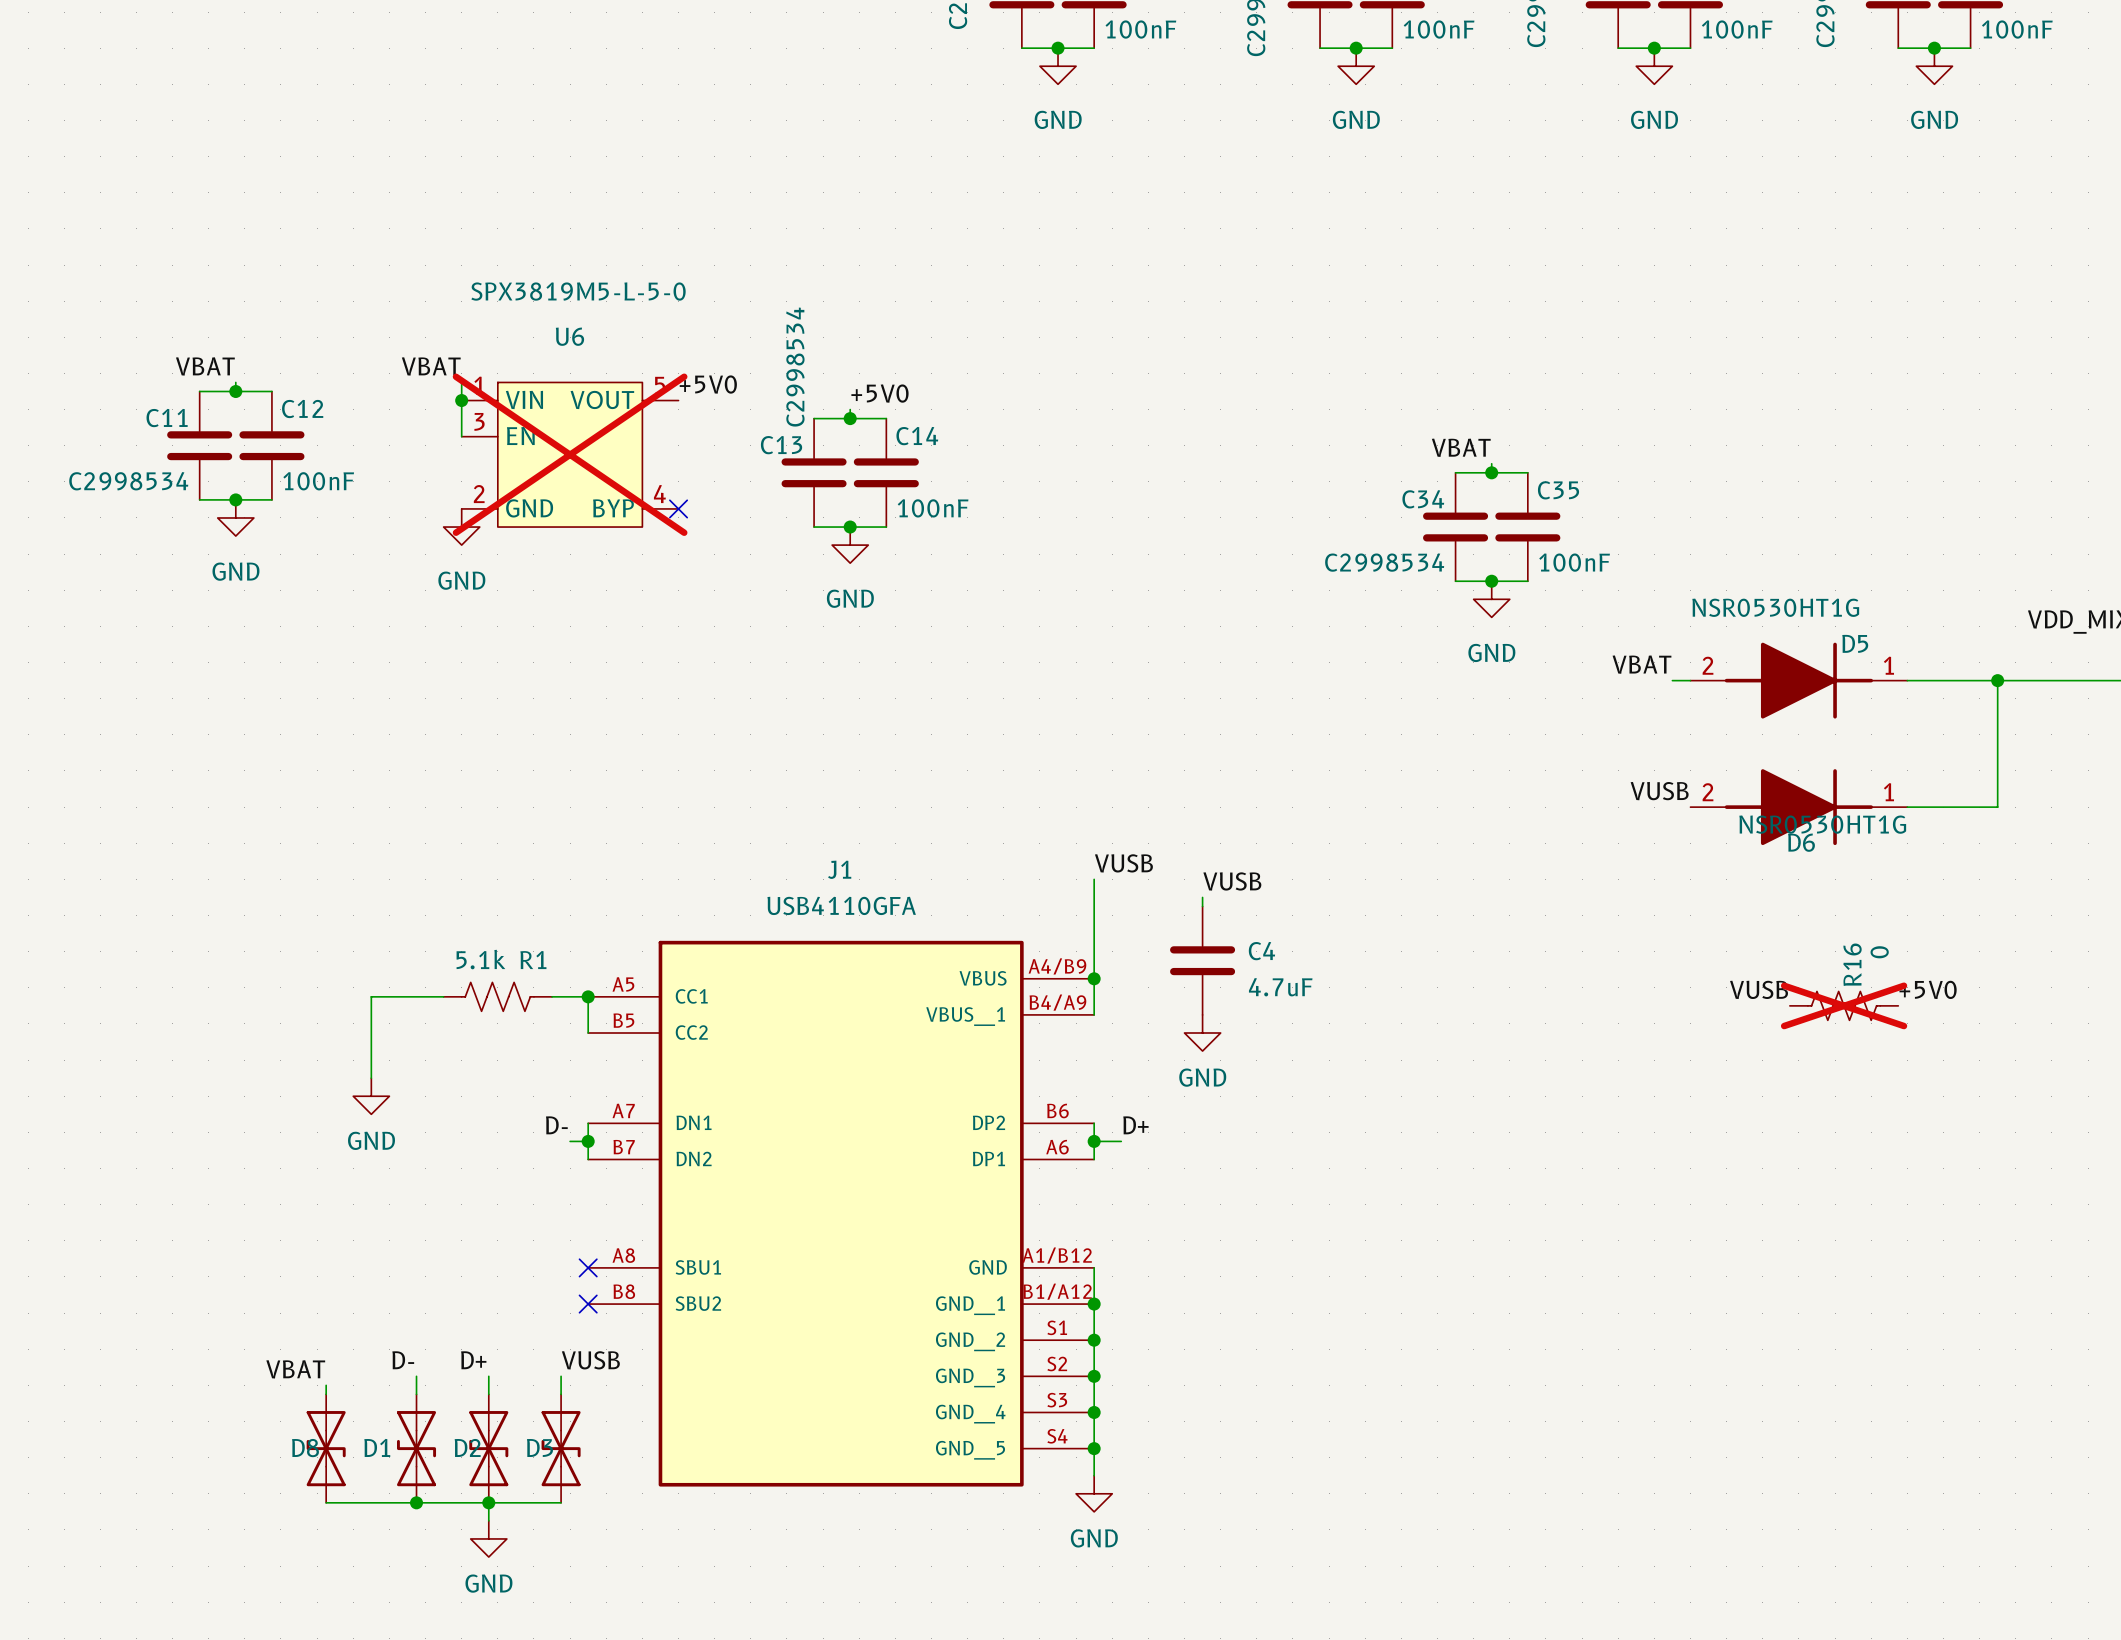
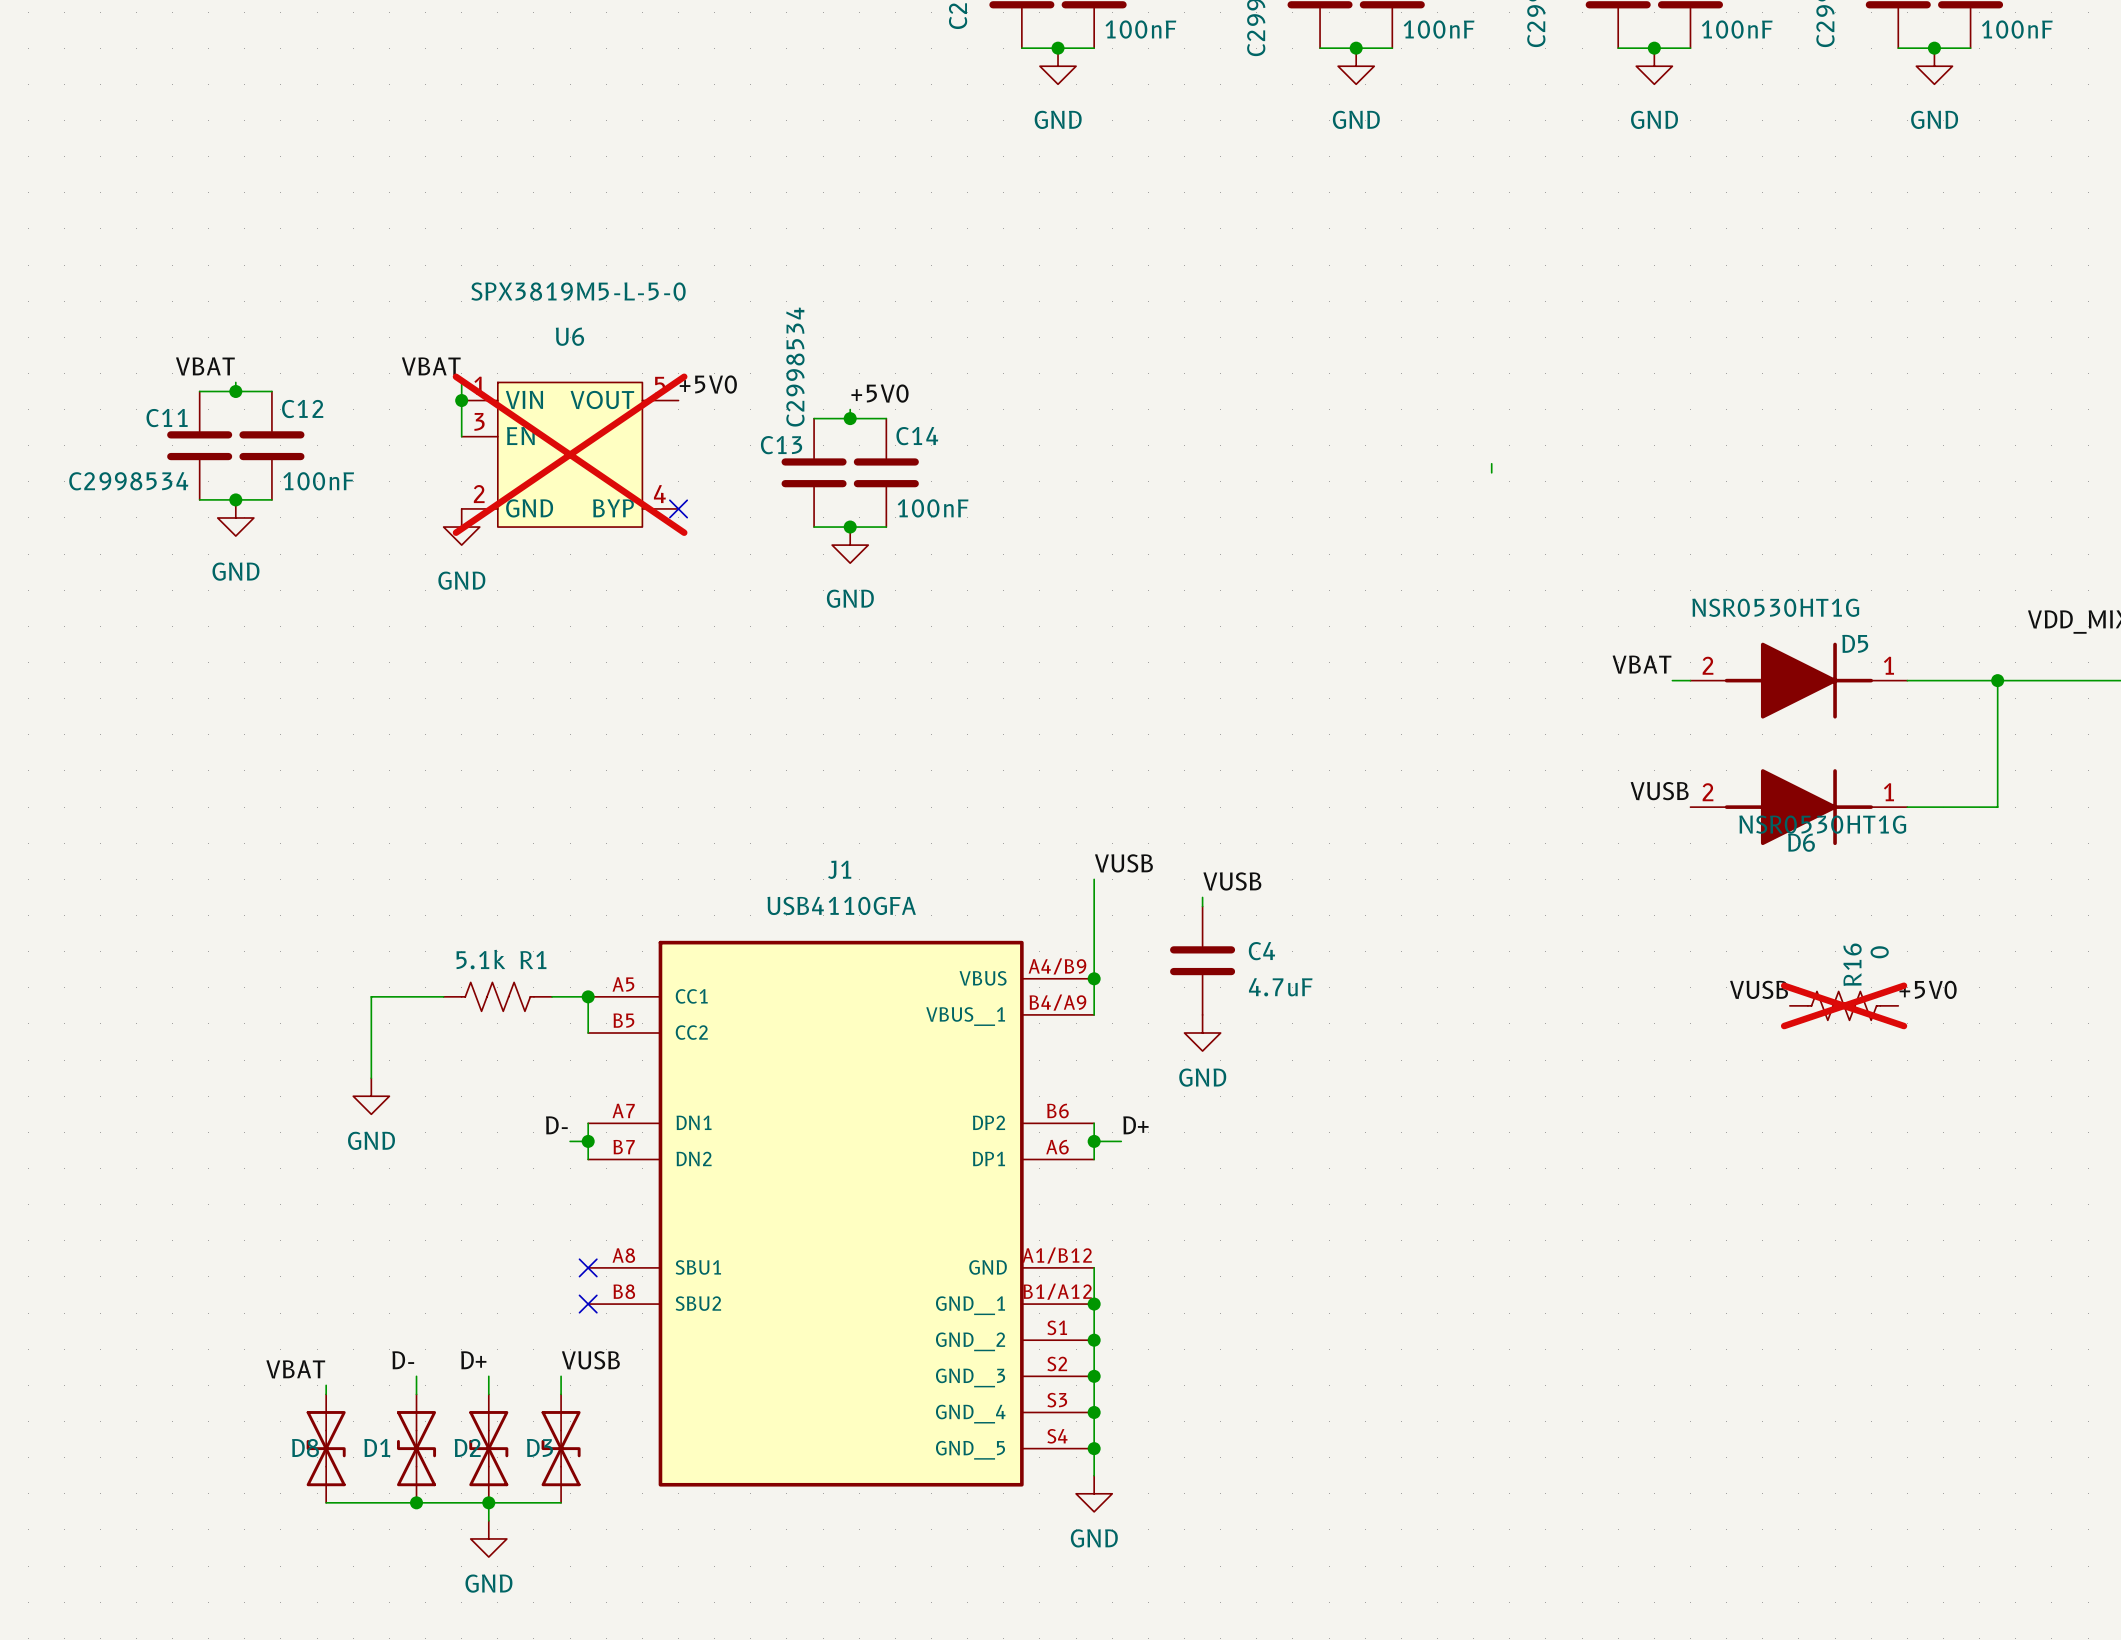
label: VBAT (1461, 447) -> none
wire: (1455, 472) (1527, 472) -> none
junction: (1491, 472) -> none
C34: C2998534 (1455, 527) -> none
C35: 100nF (1527, 527) -> none
wire: (1455, 581) (1527, 581) -> none
junction: (1491, 581) -> none
power symbol: GND (1491, 599) -> none

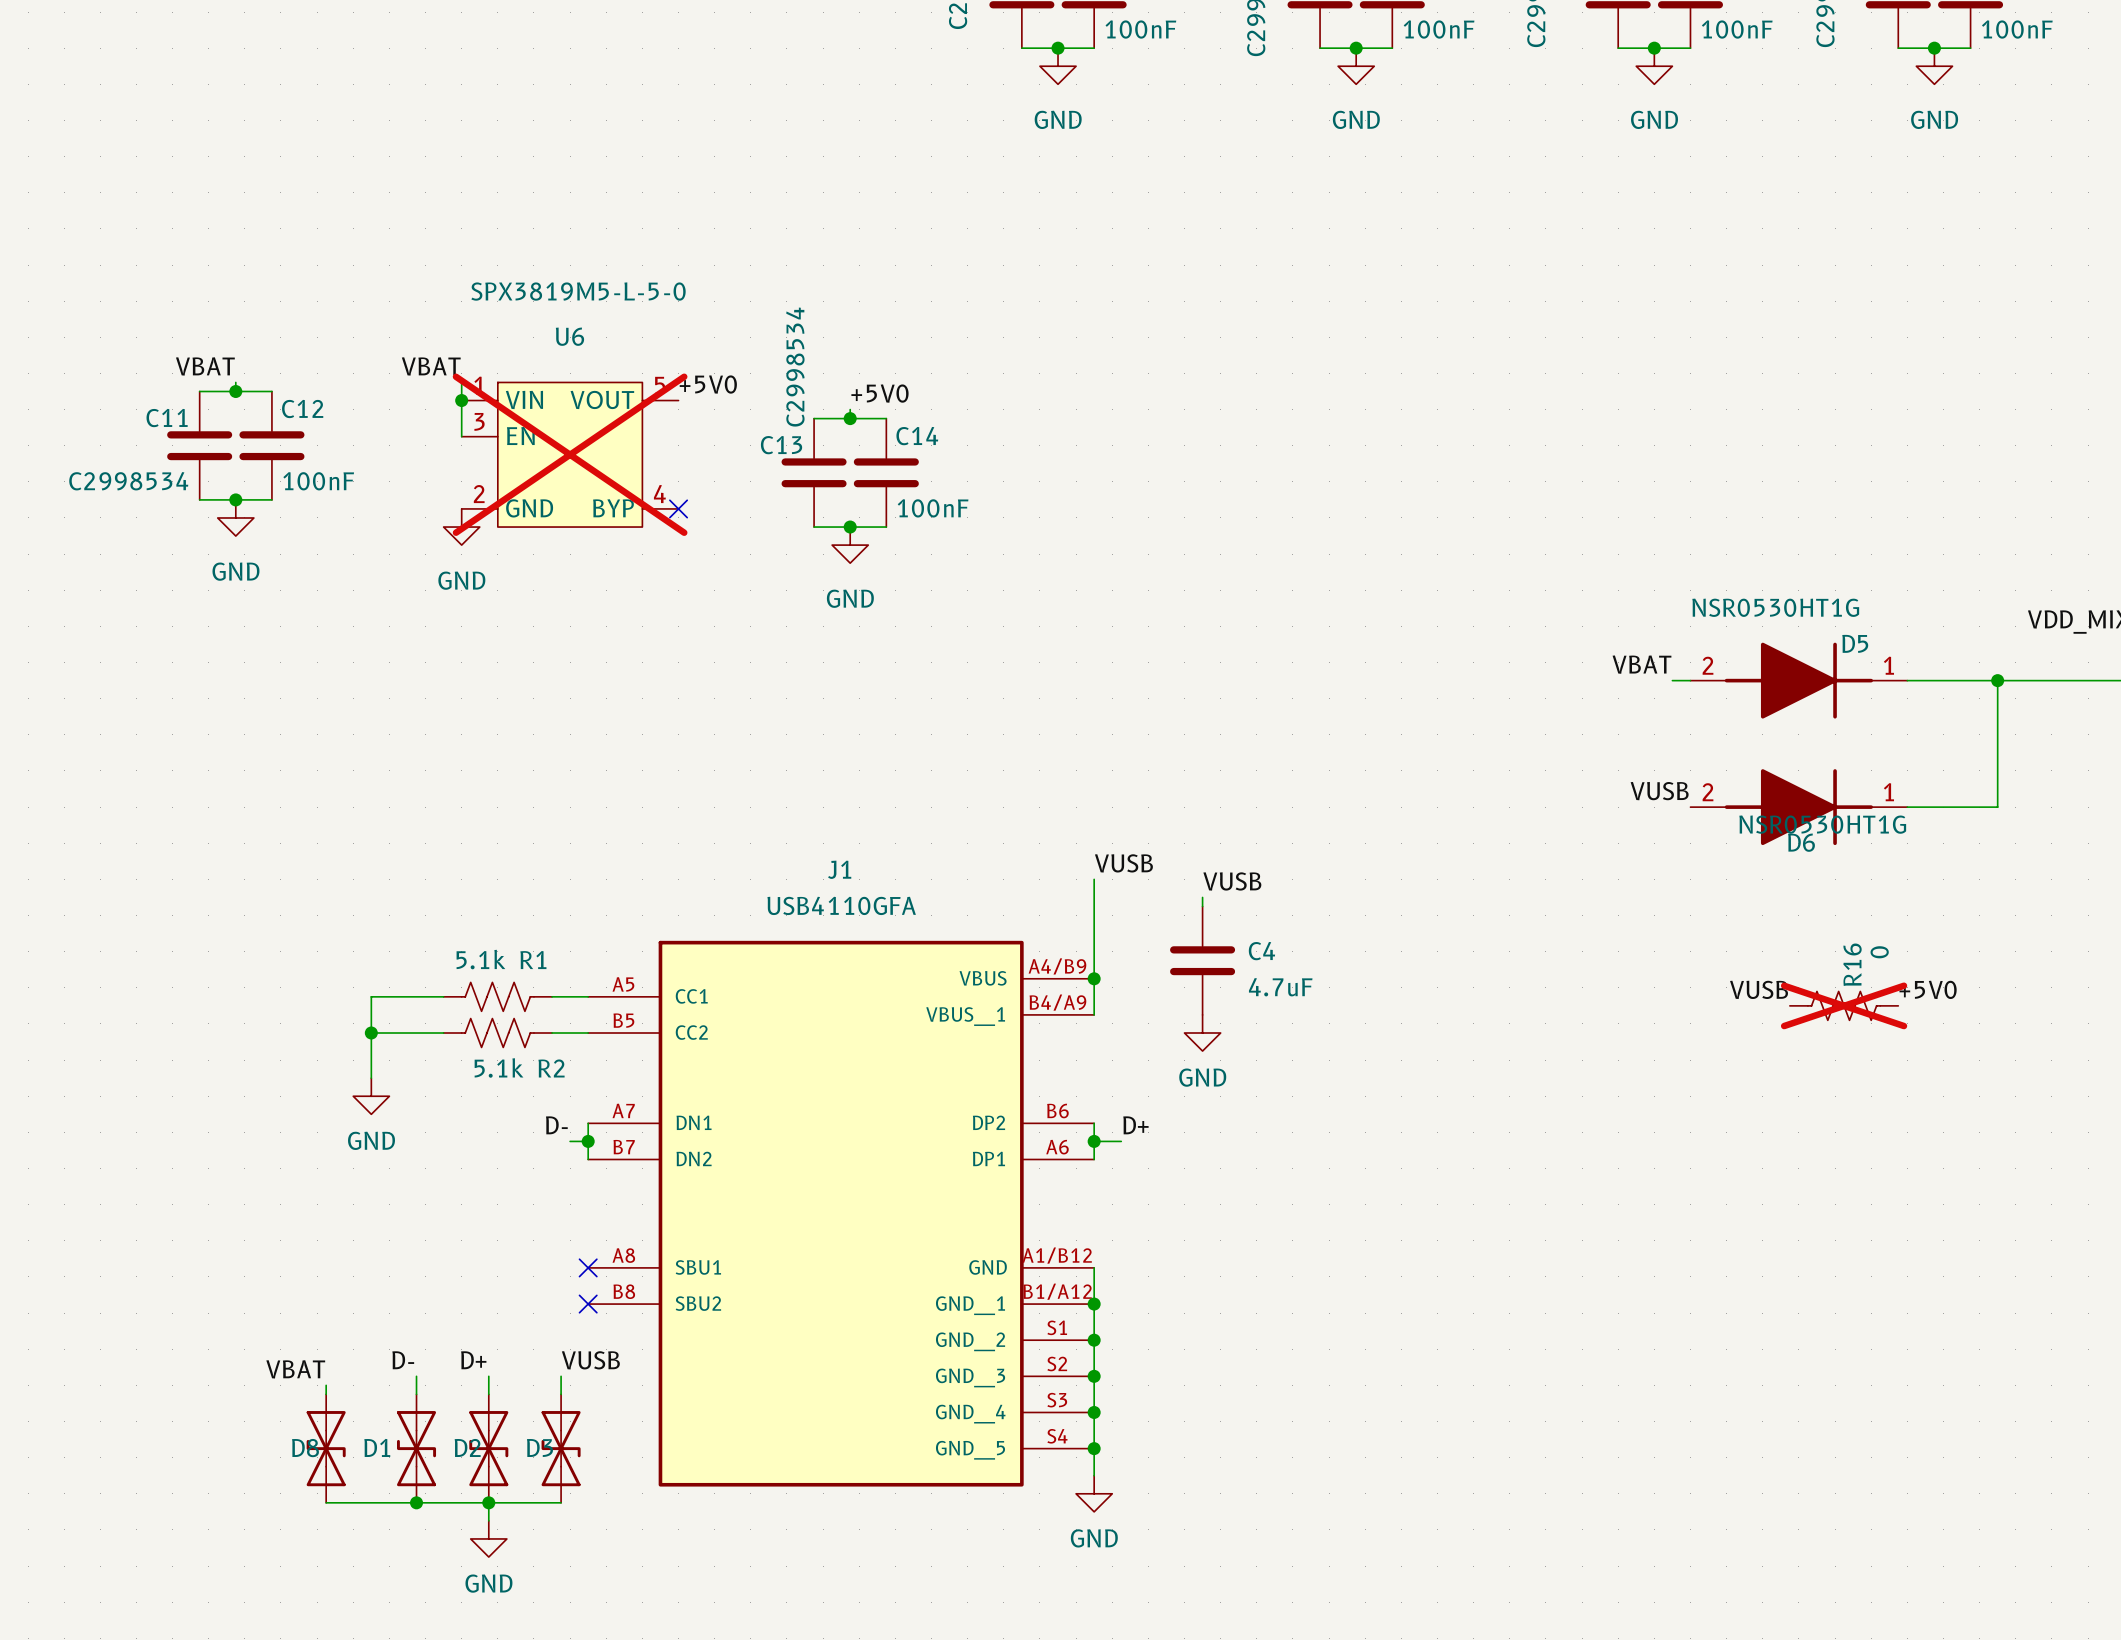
wire: (1491, 463) (1491, 472) -> none
wire: (588, 996) (588, 1033) -> (552, 1033) (588, 1033)
junction: (588, 996) -> none
wire: none -> (371, 1033) (443, 1033)
junction: none -> (371, 1033)
R2: none -> 5.1k (497, 1033)

